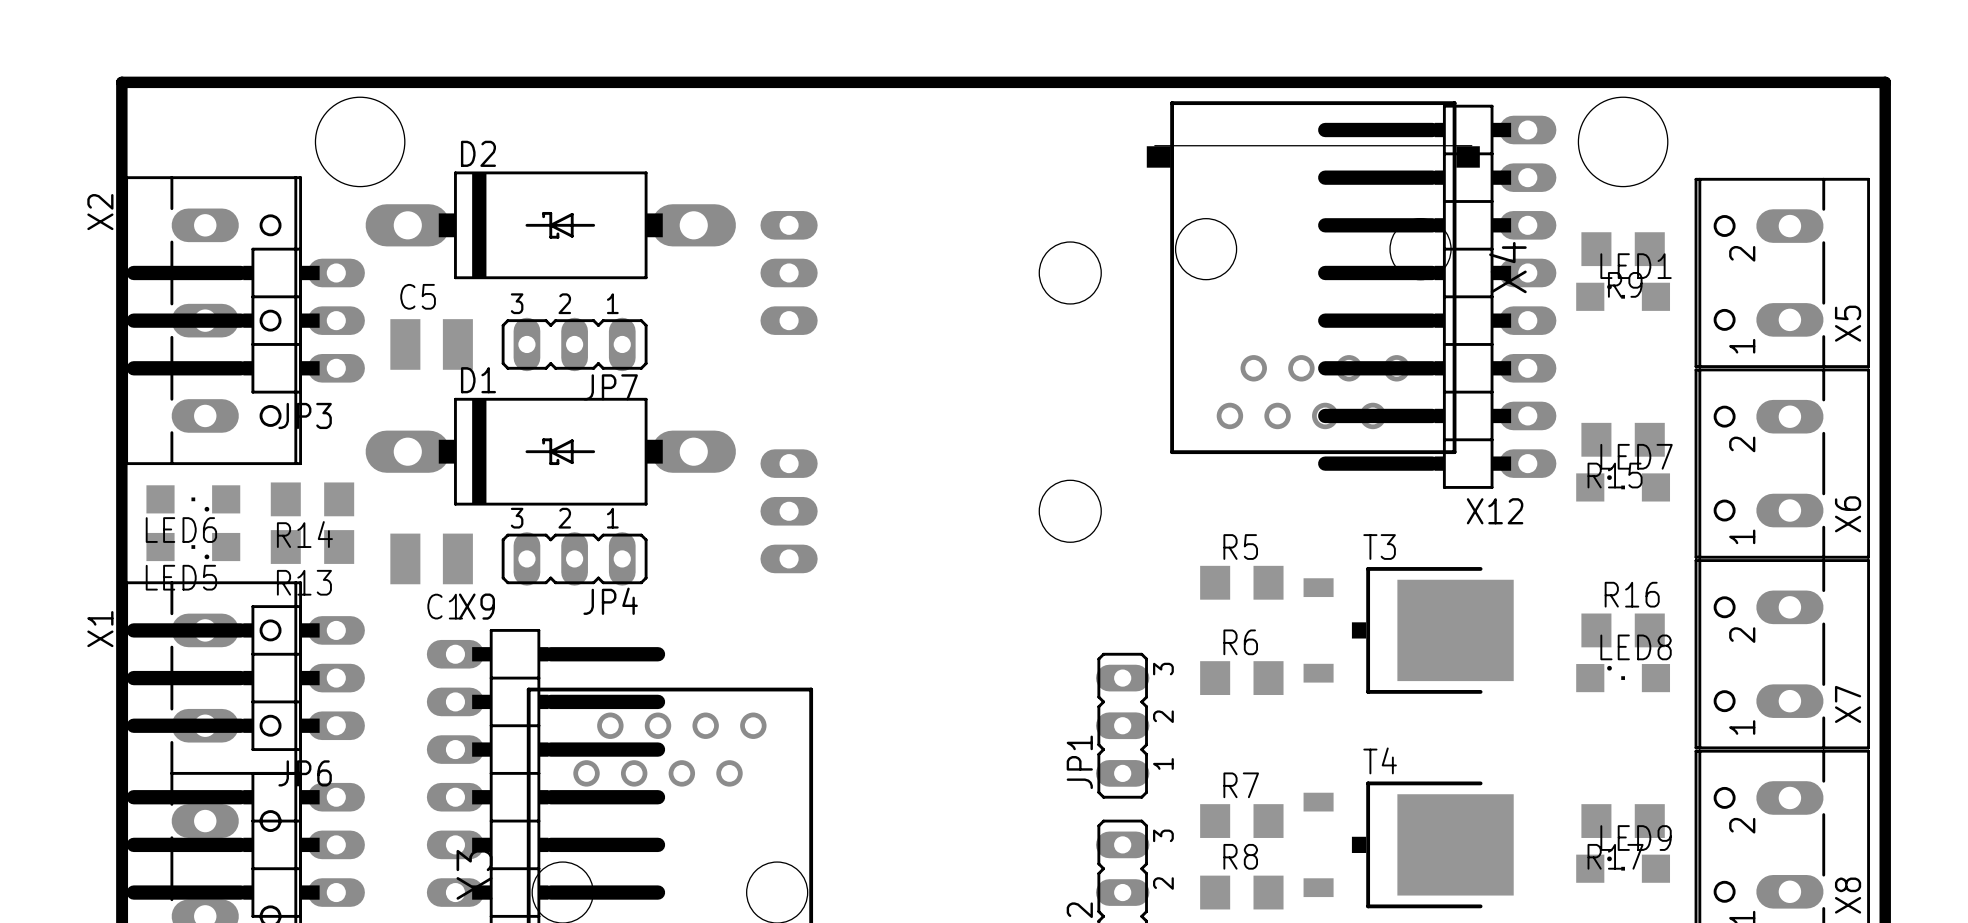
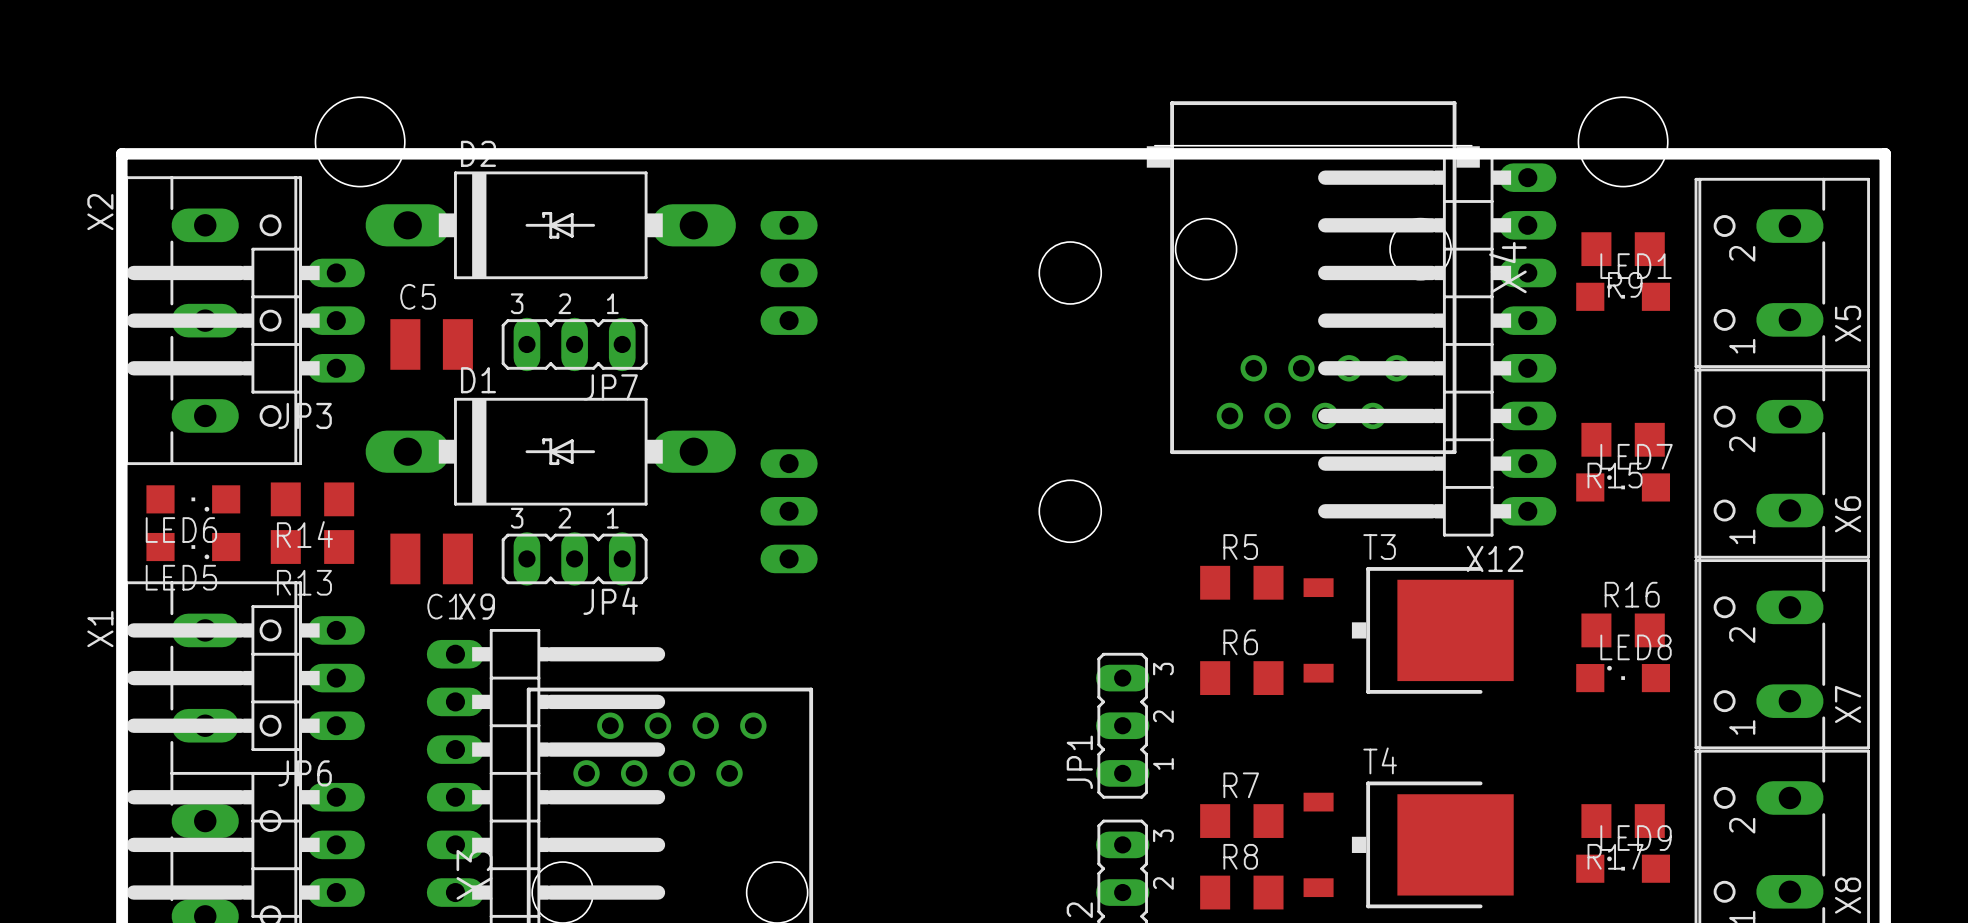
board edge: (121, 153) (121, 82) (1885, 82) (1885, 153) -> (121, 153) (1885, 153)
X12 position: (1437, 296) -> (1437, 344)

